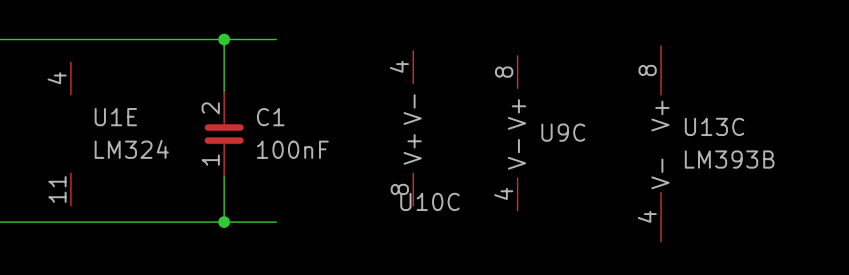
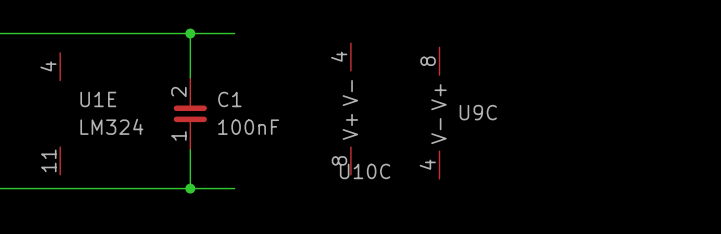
U13C: LM393B (661, 143) -> none

